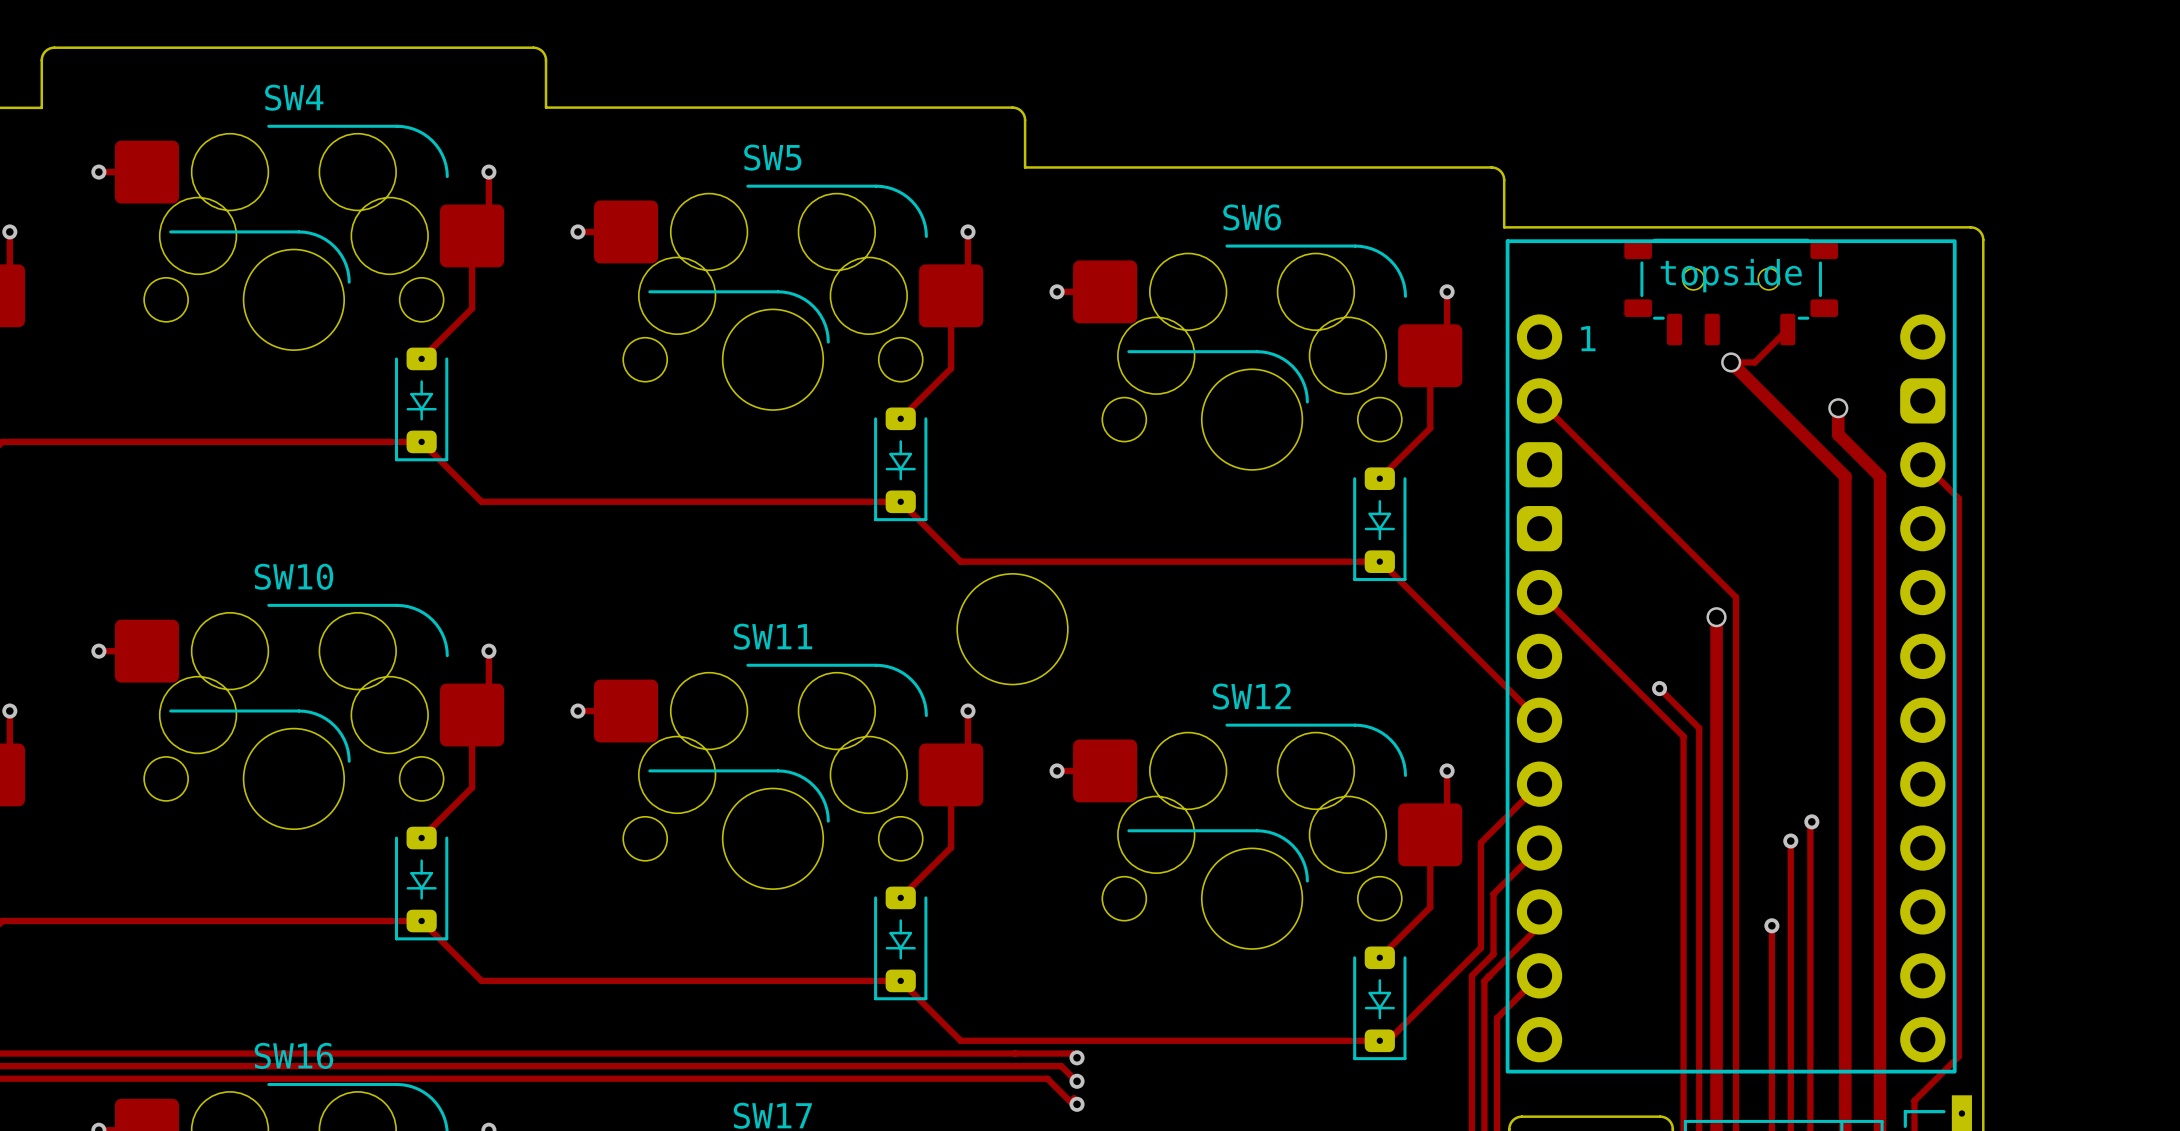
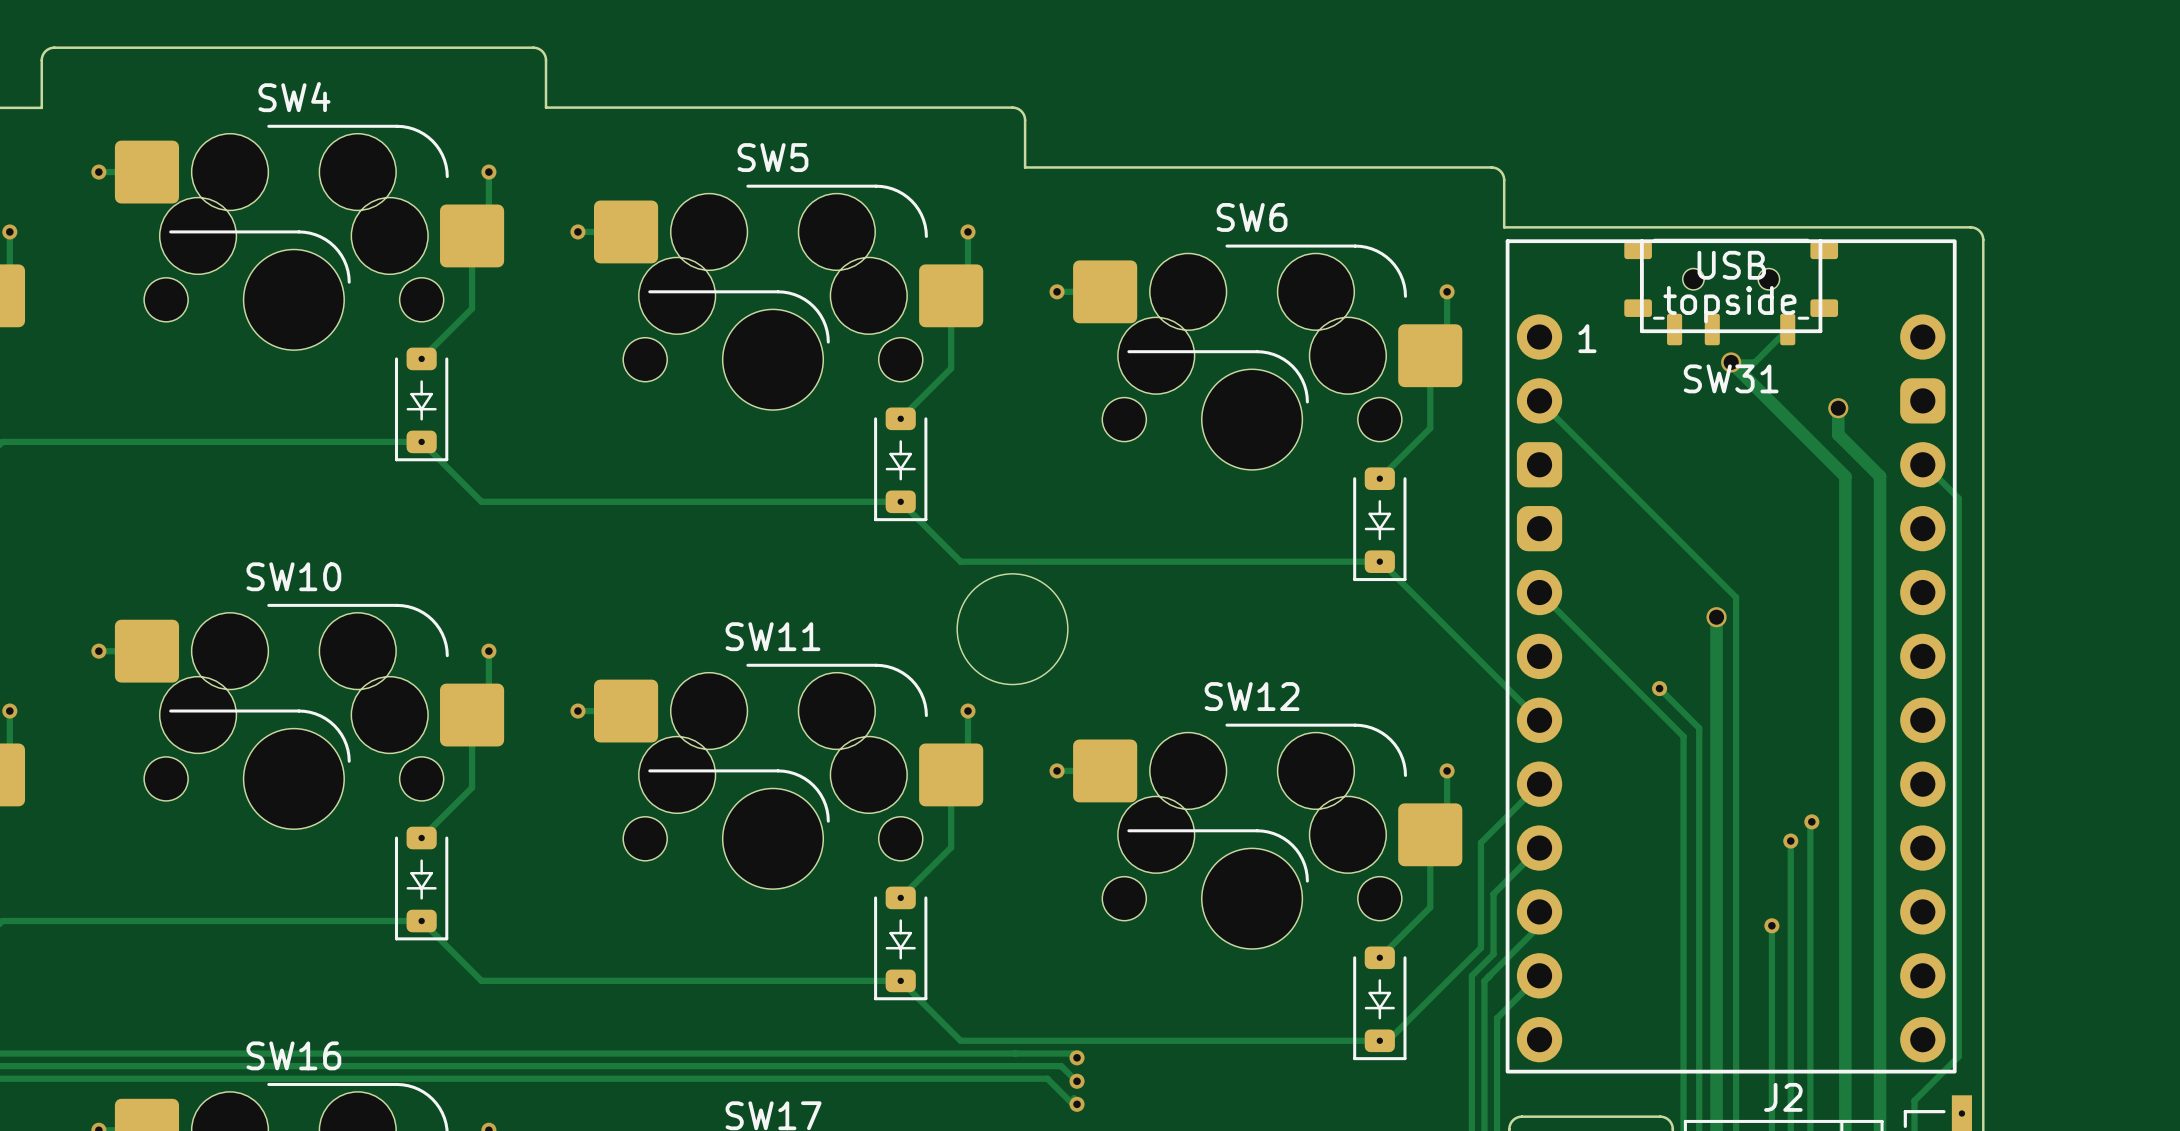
part footprint: [1505, 239, 1957, 1074] -> [1505, 239, 1957, 1074]
SW31 name: none -> SW31 (1731, 378)
J2 name: none -> J2 (1783, 1097)

